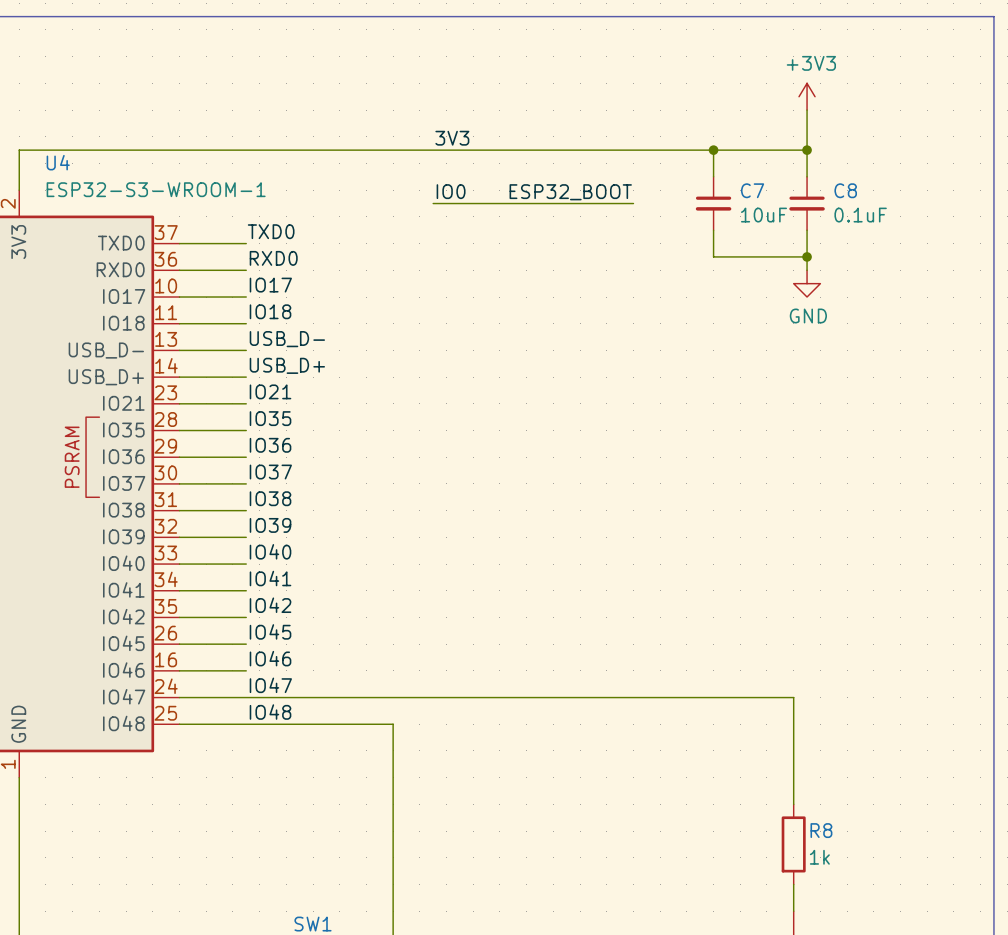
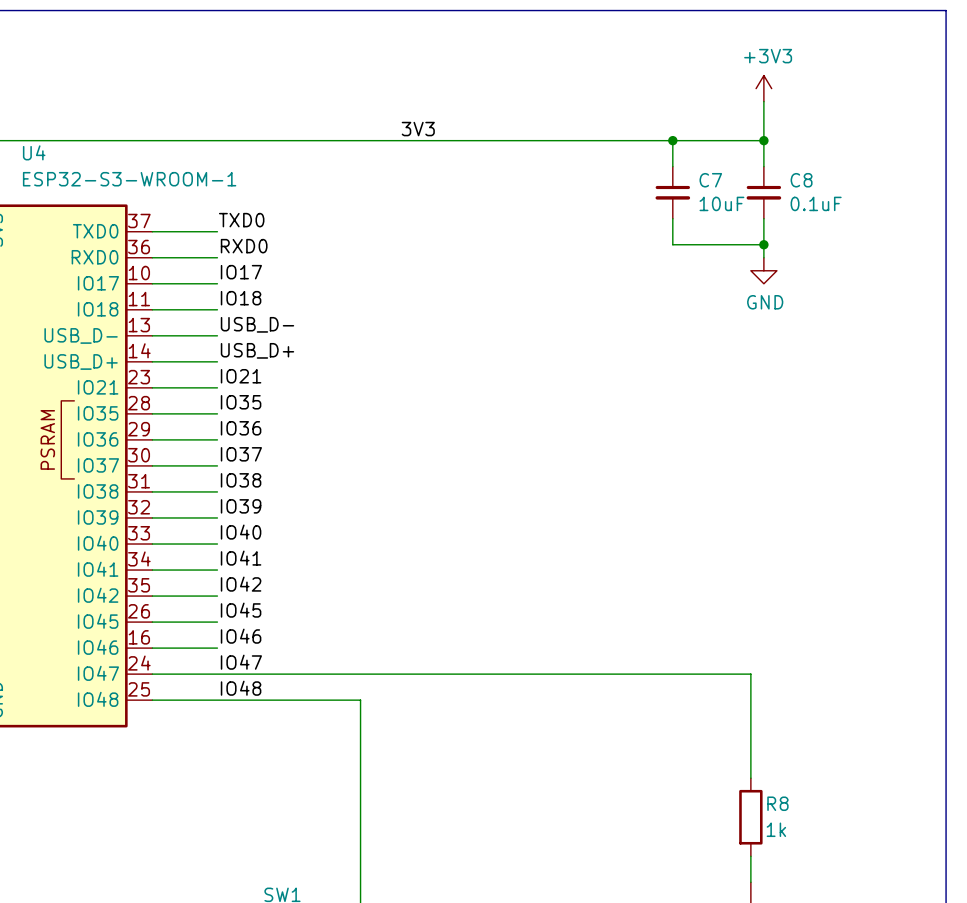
label: IO0 (451, 191) -> none
label: ESP32_BOOT (570, 192) -> none
wire: (433, 203) (633, 203) -> none

